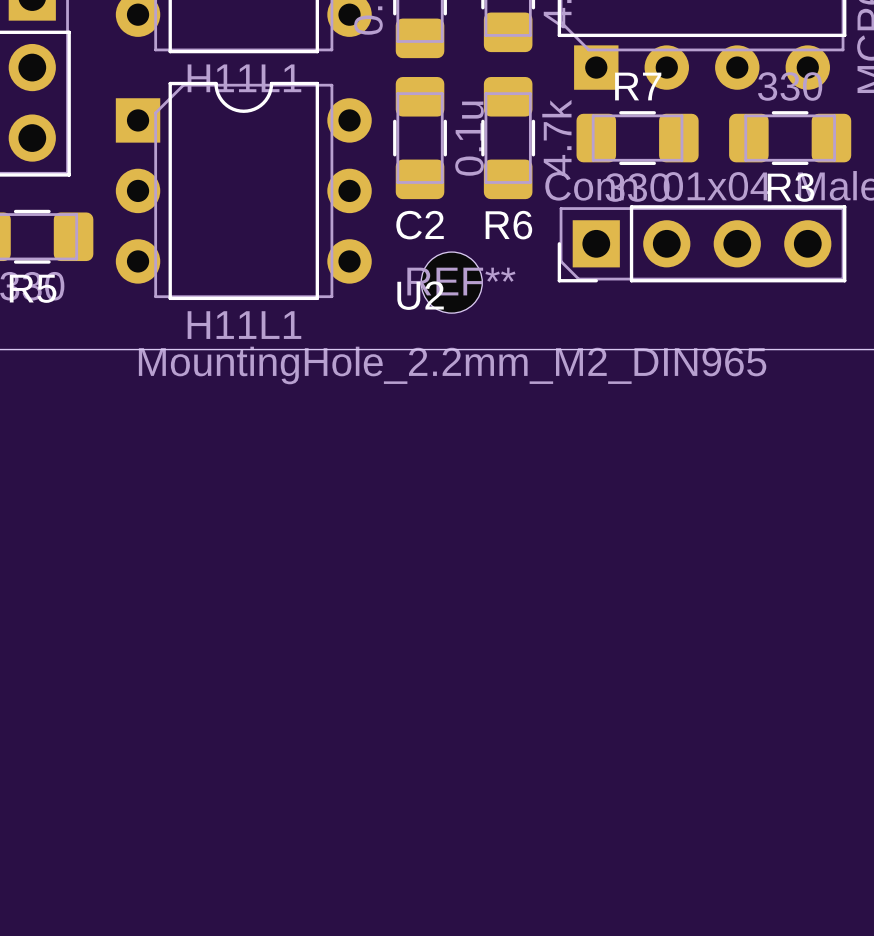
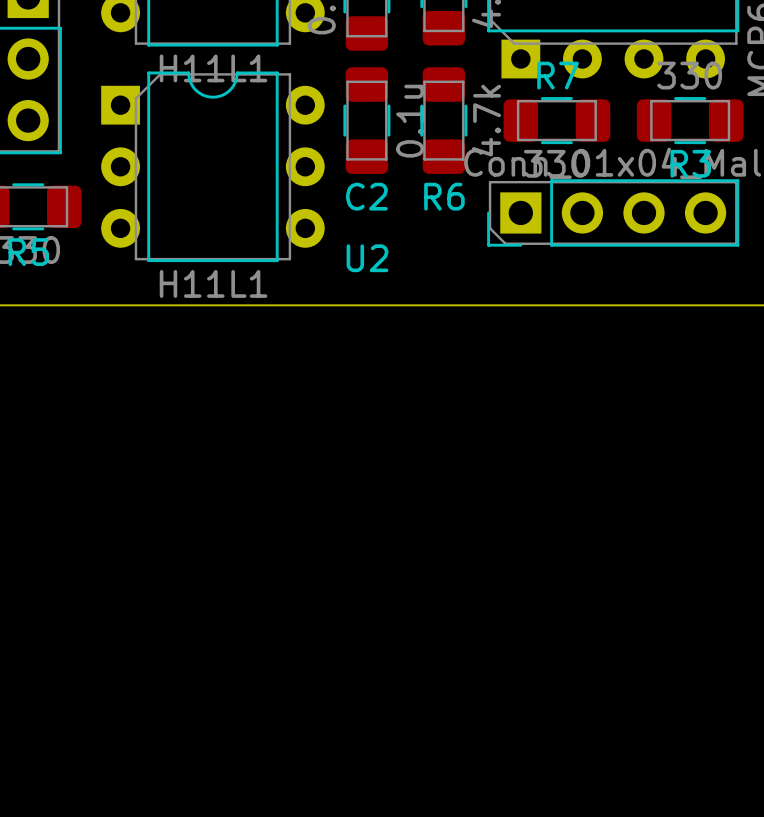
REF**: MountingHole_2.2mm_M2_DIN965 (451, 282) -> none

